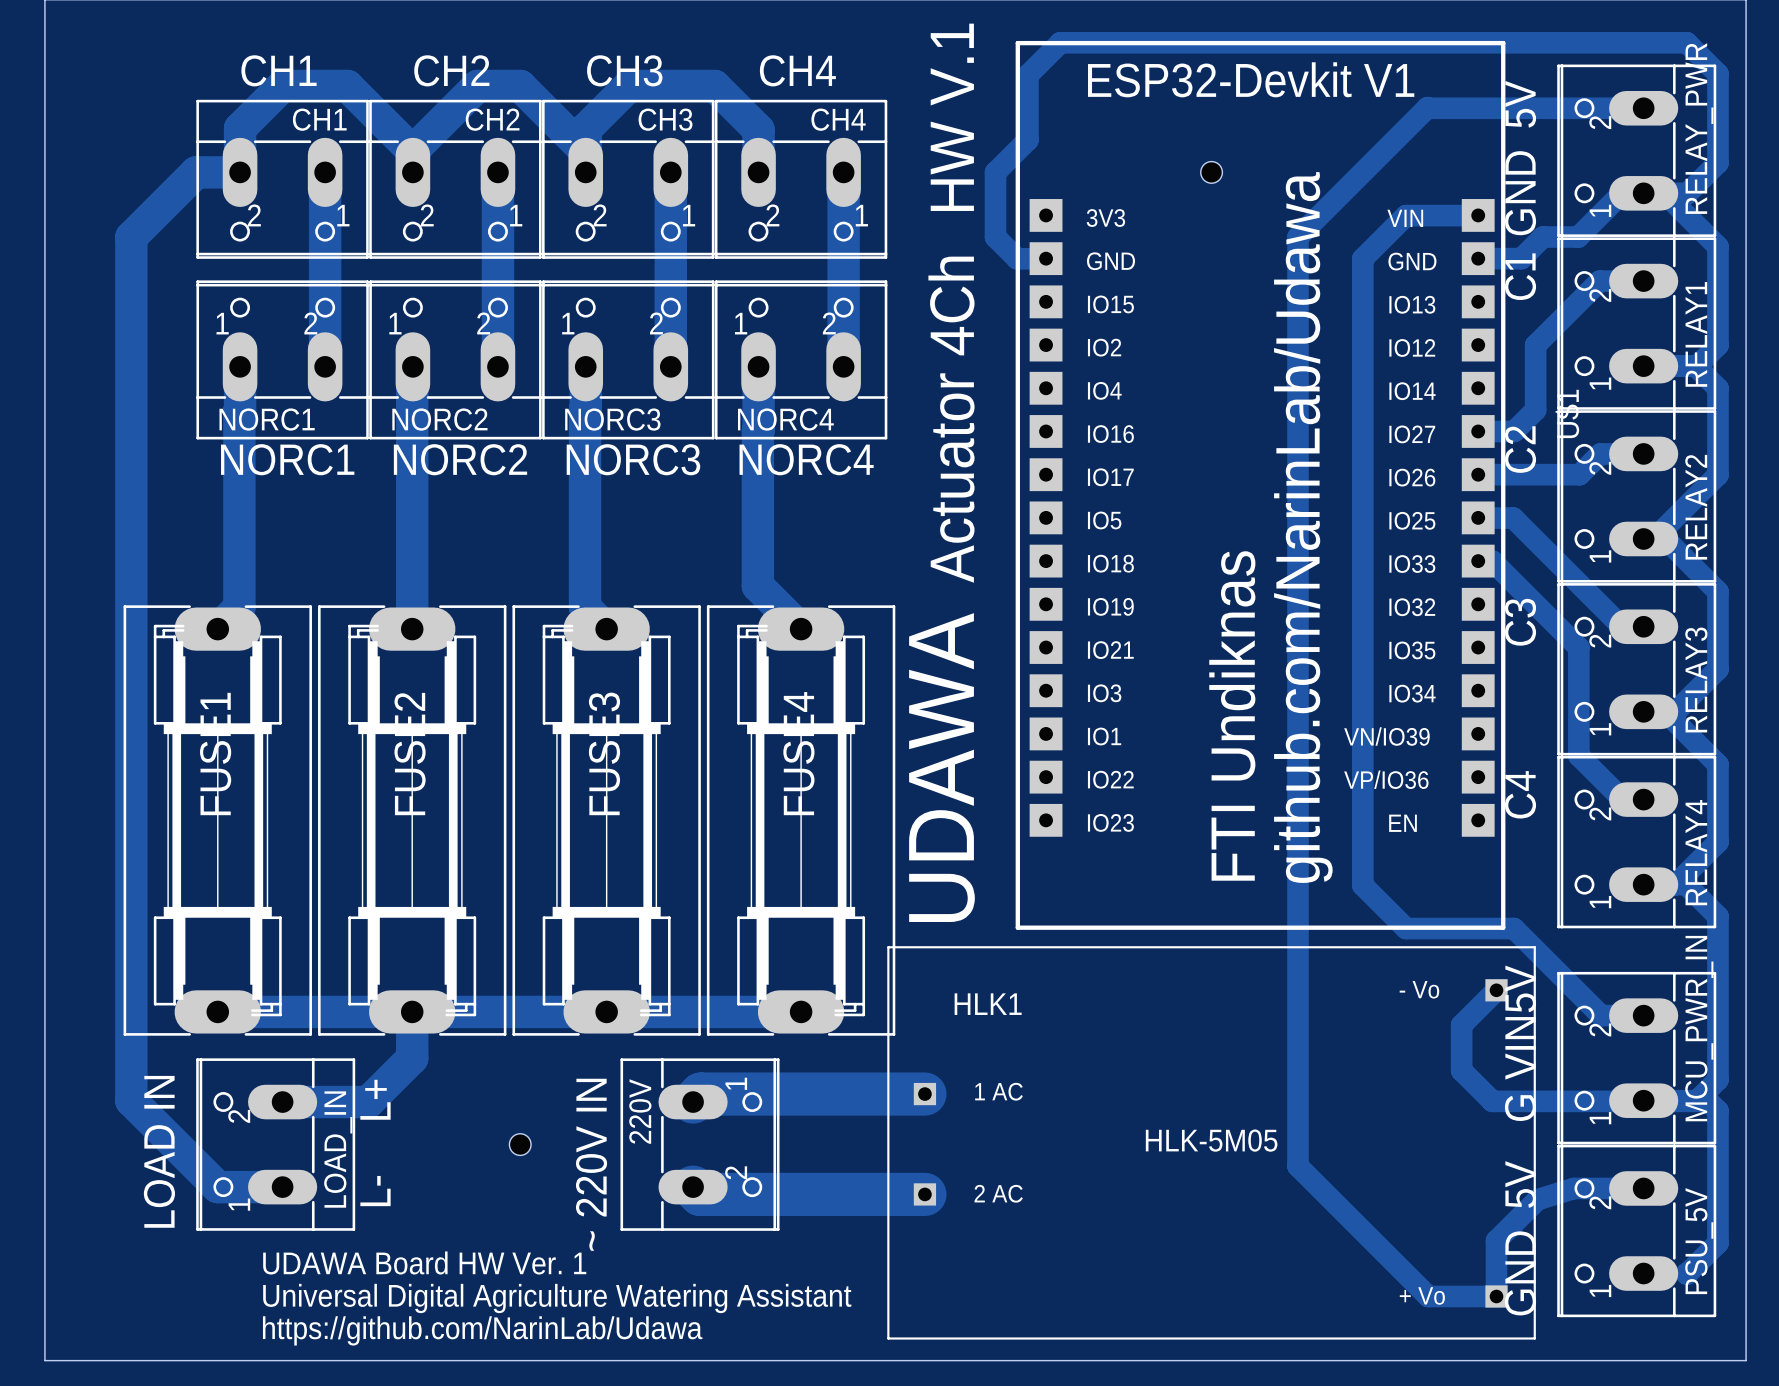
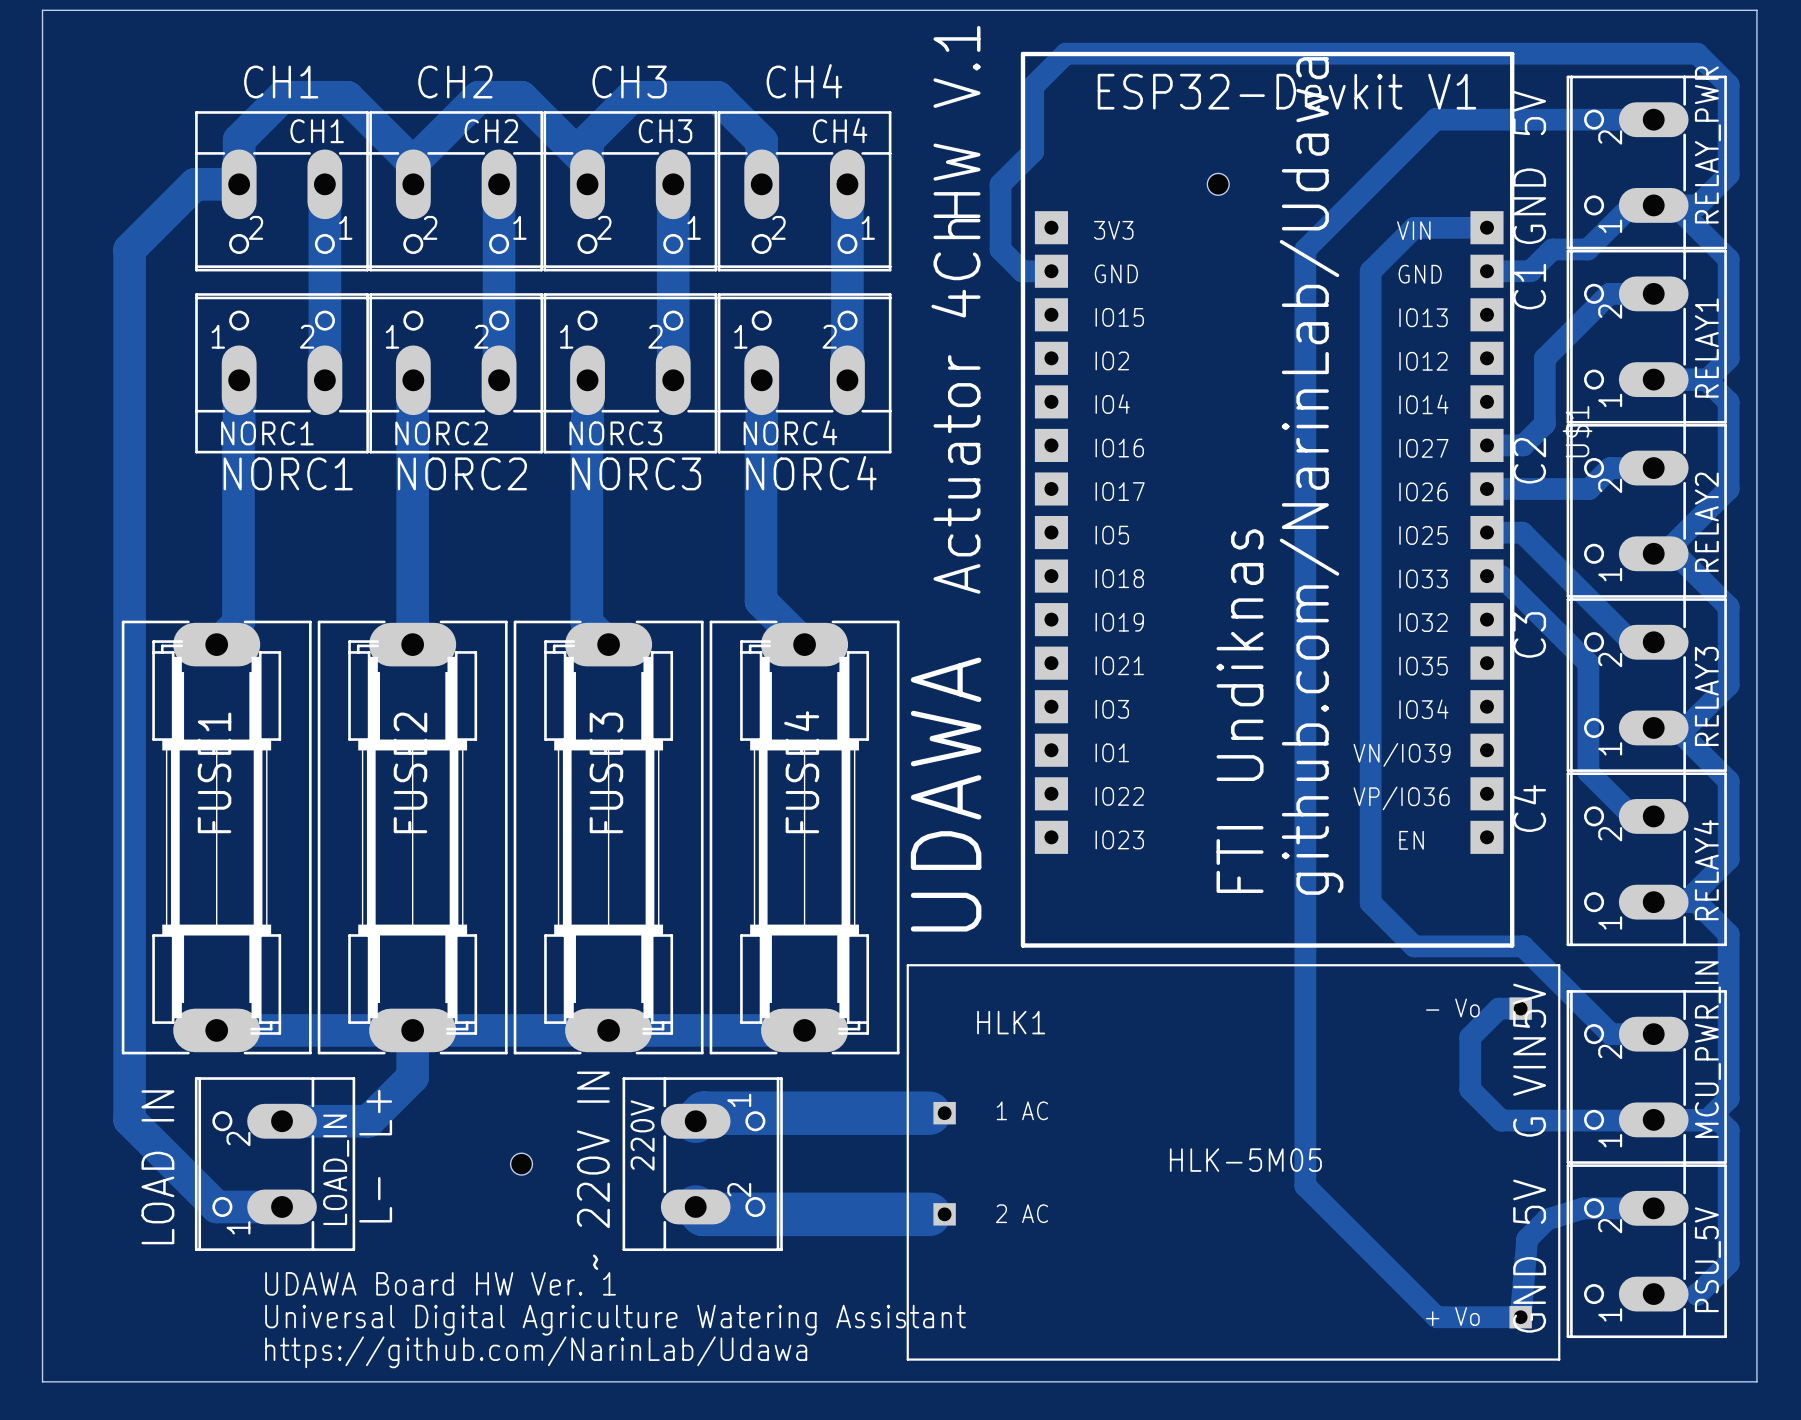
track: (1496, 990) (1461, 1025) -> (1520, 1008) (1498, 1008) (1470, 1037) (1470, 1043)
HLK1 position: (1211, 1142) -> (1233, 1162)
track: (1518, 1219) (1496, 1240) (1496, 1296) -> (1527, 1239) (1520, 1317) (1505, 1317)

